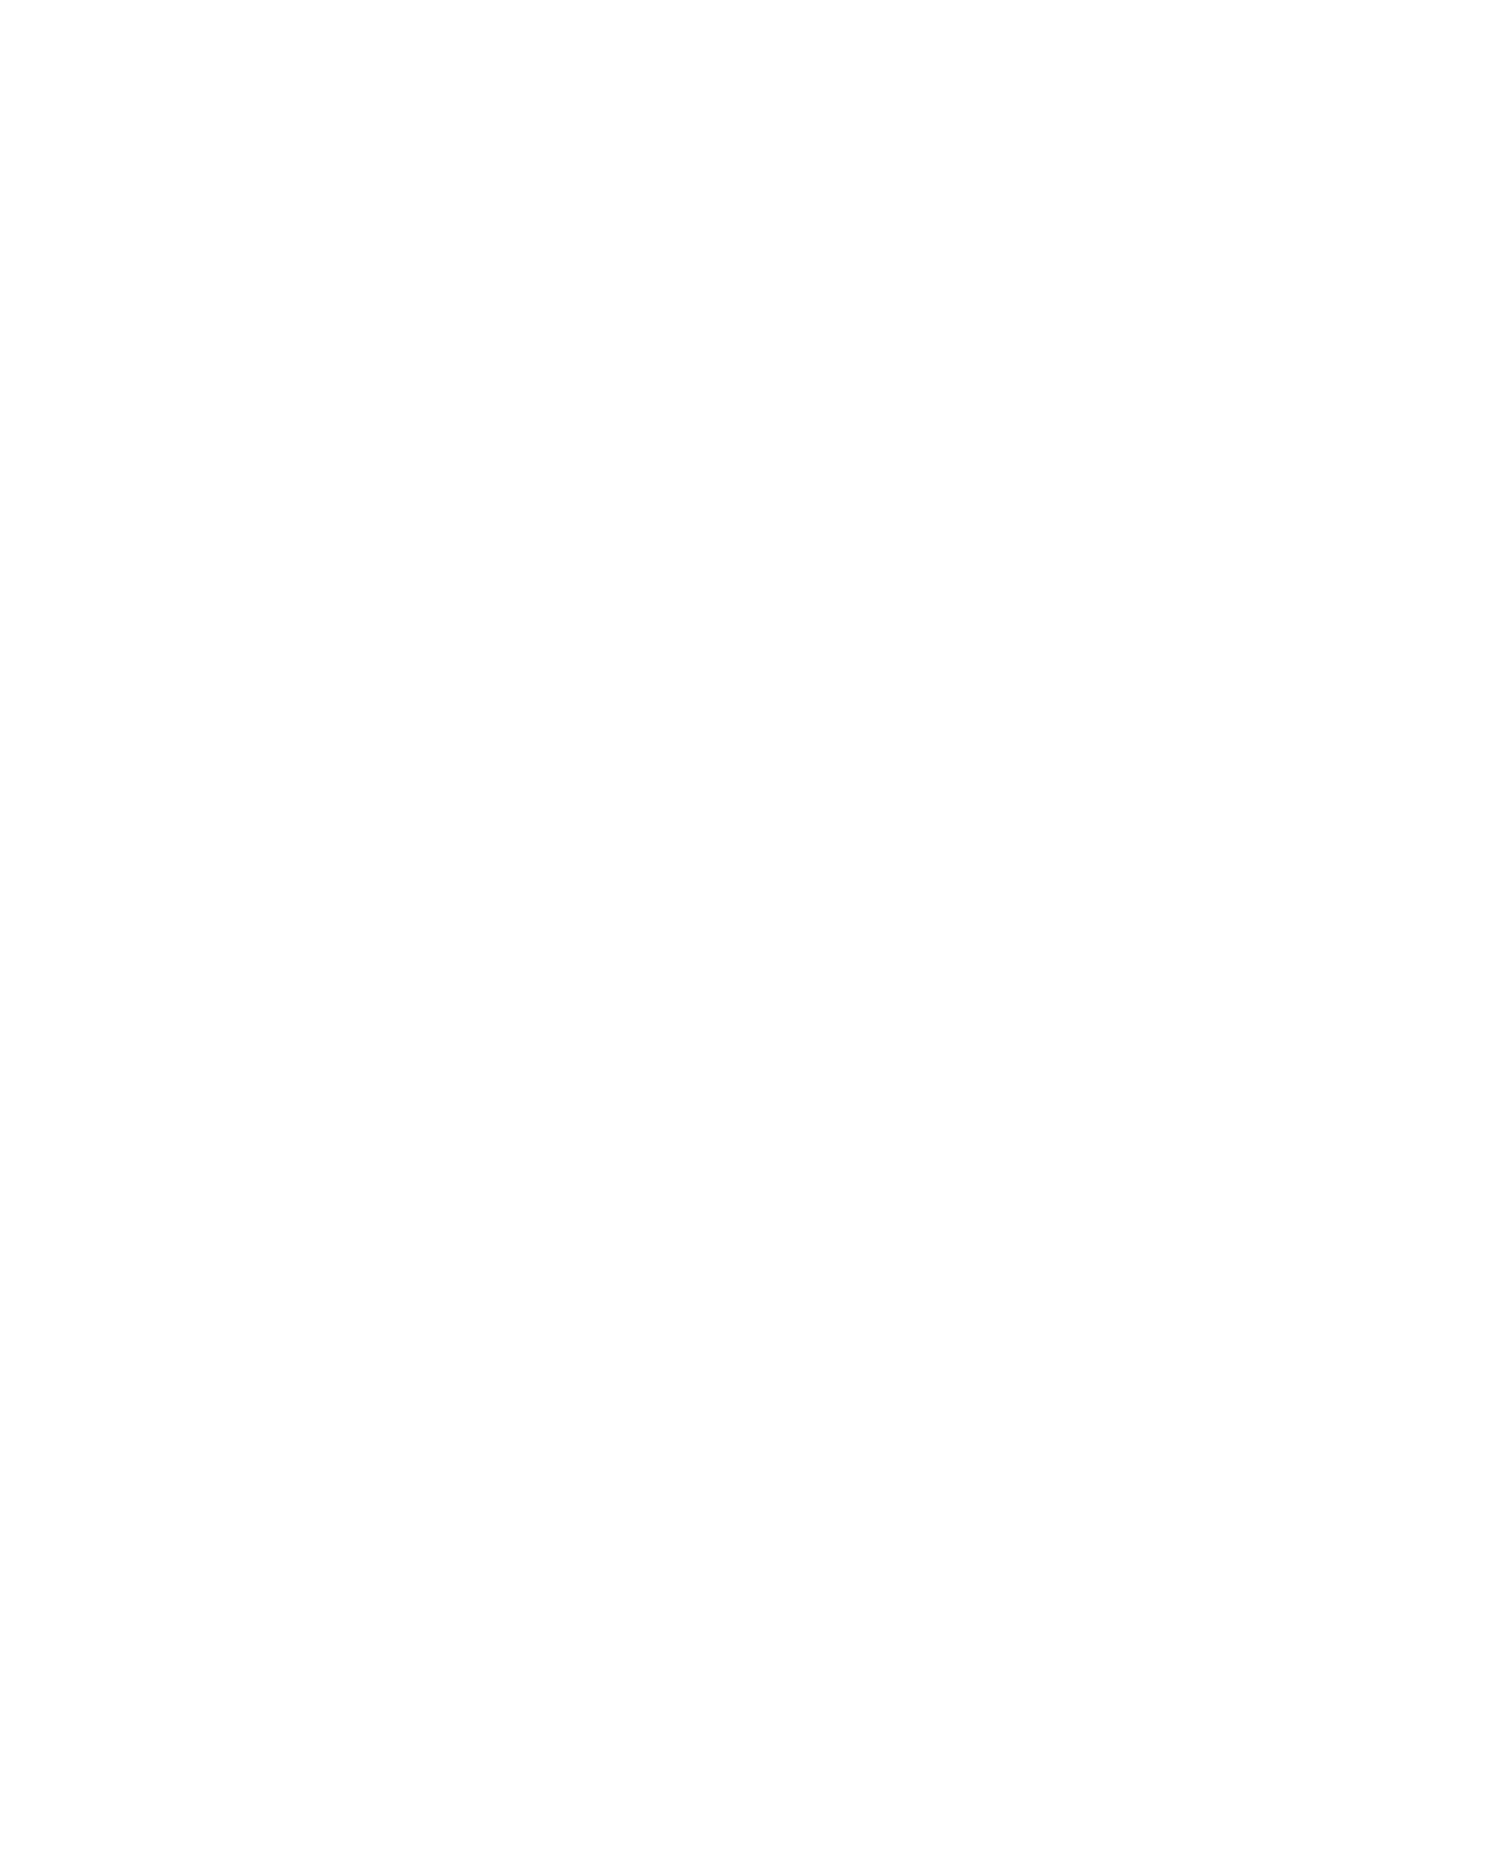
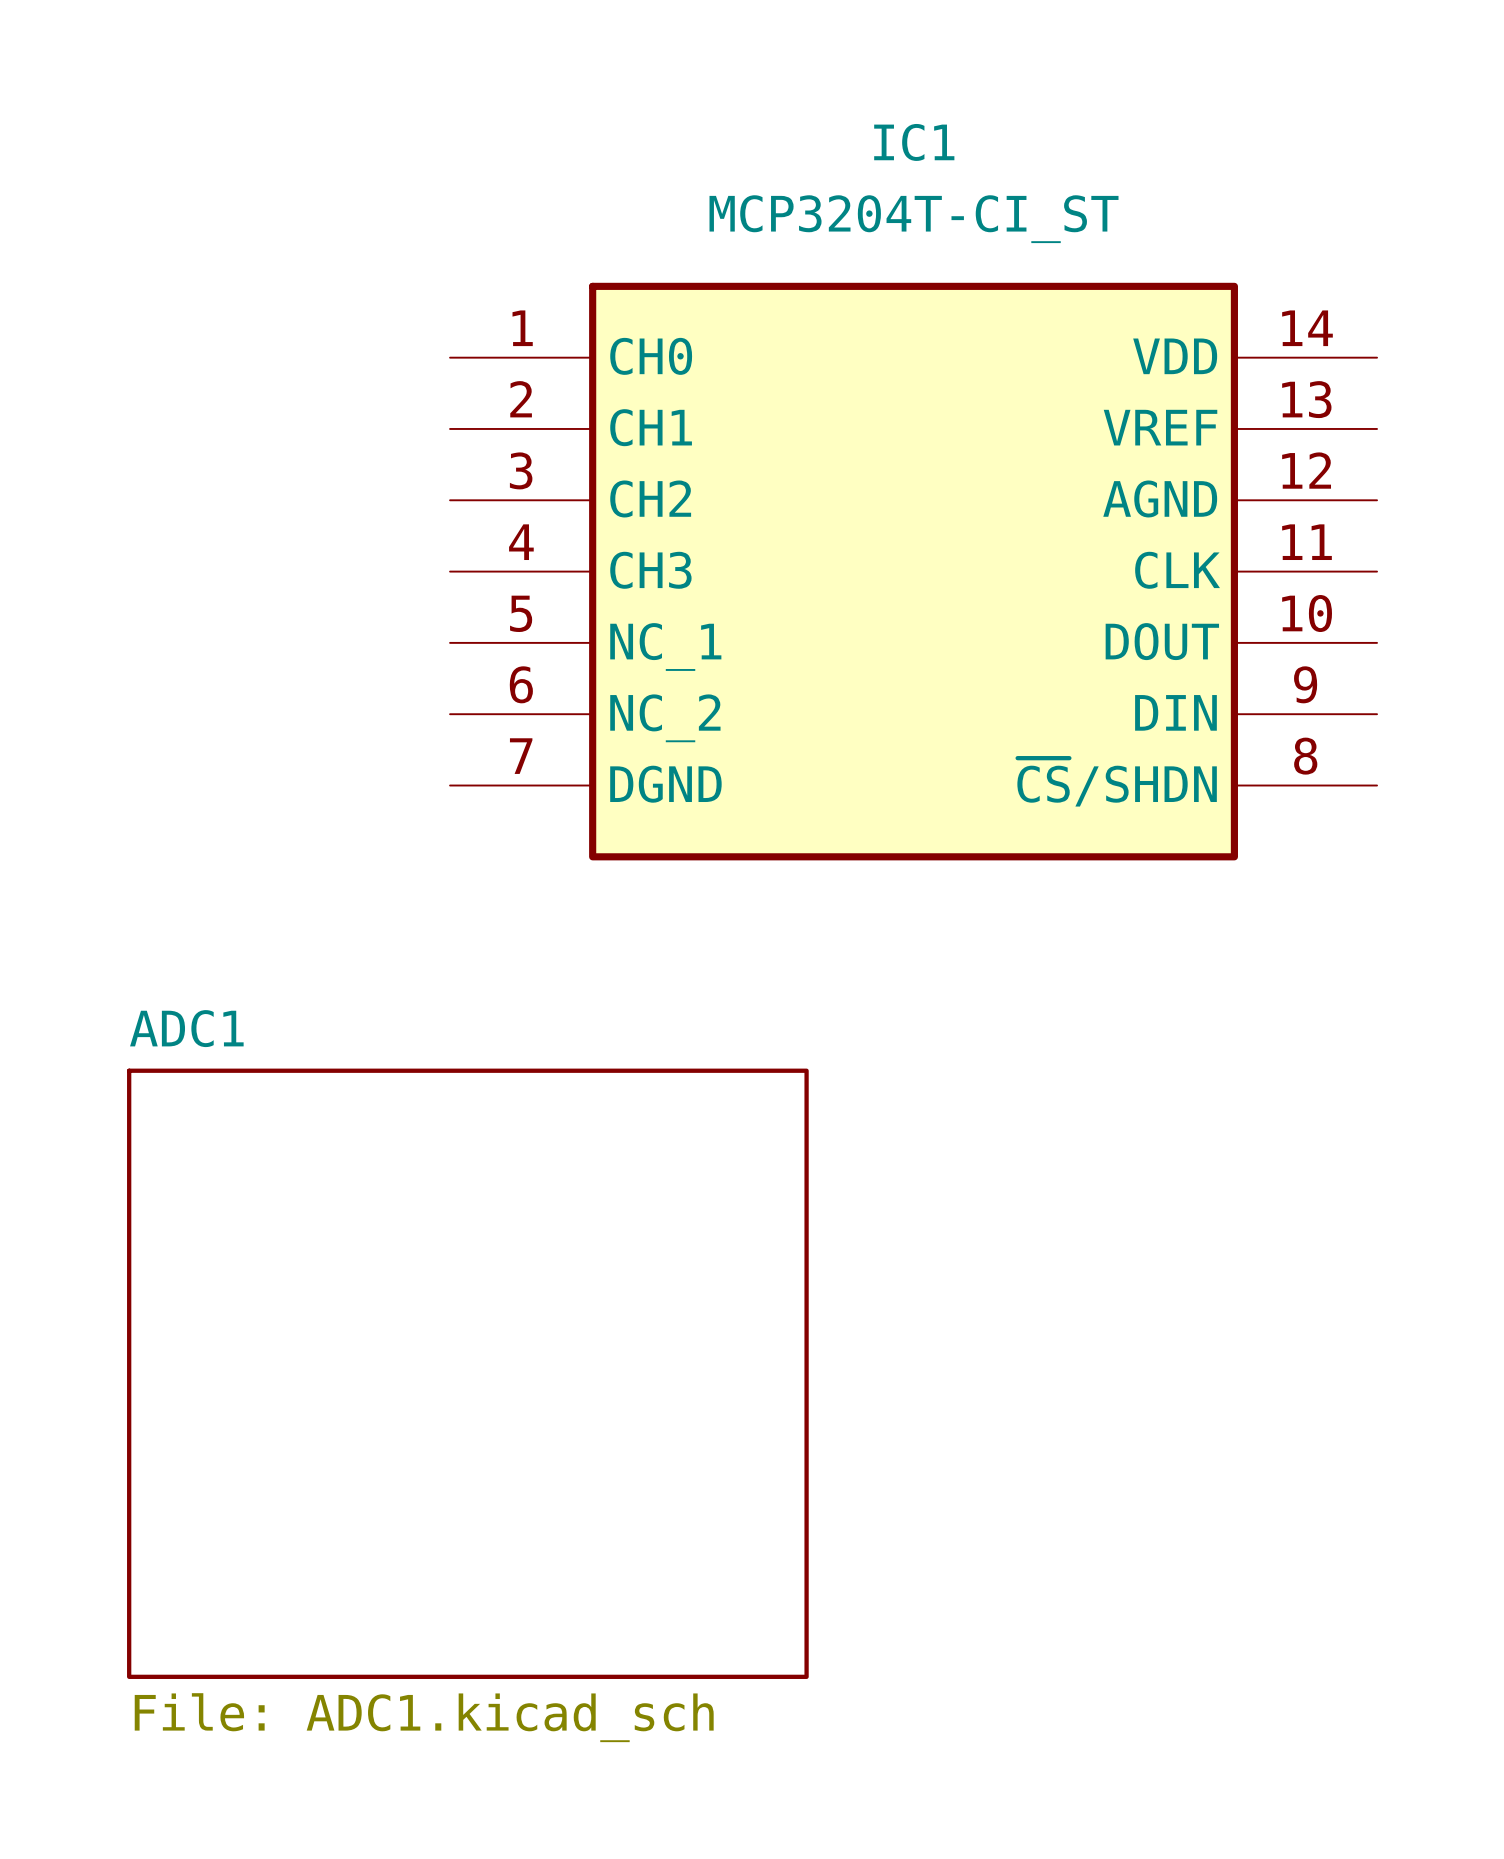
IC1: none -> MCP3204T-CI_ST (913, 571)
sheet ADC1: none -> File: ADC1.kicad_sch (467, 1373)

